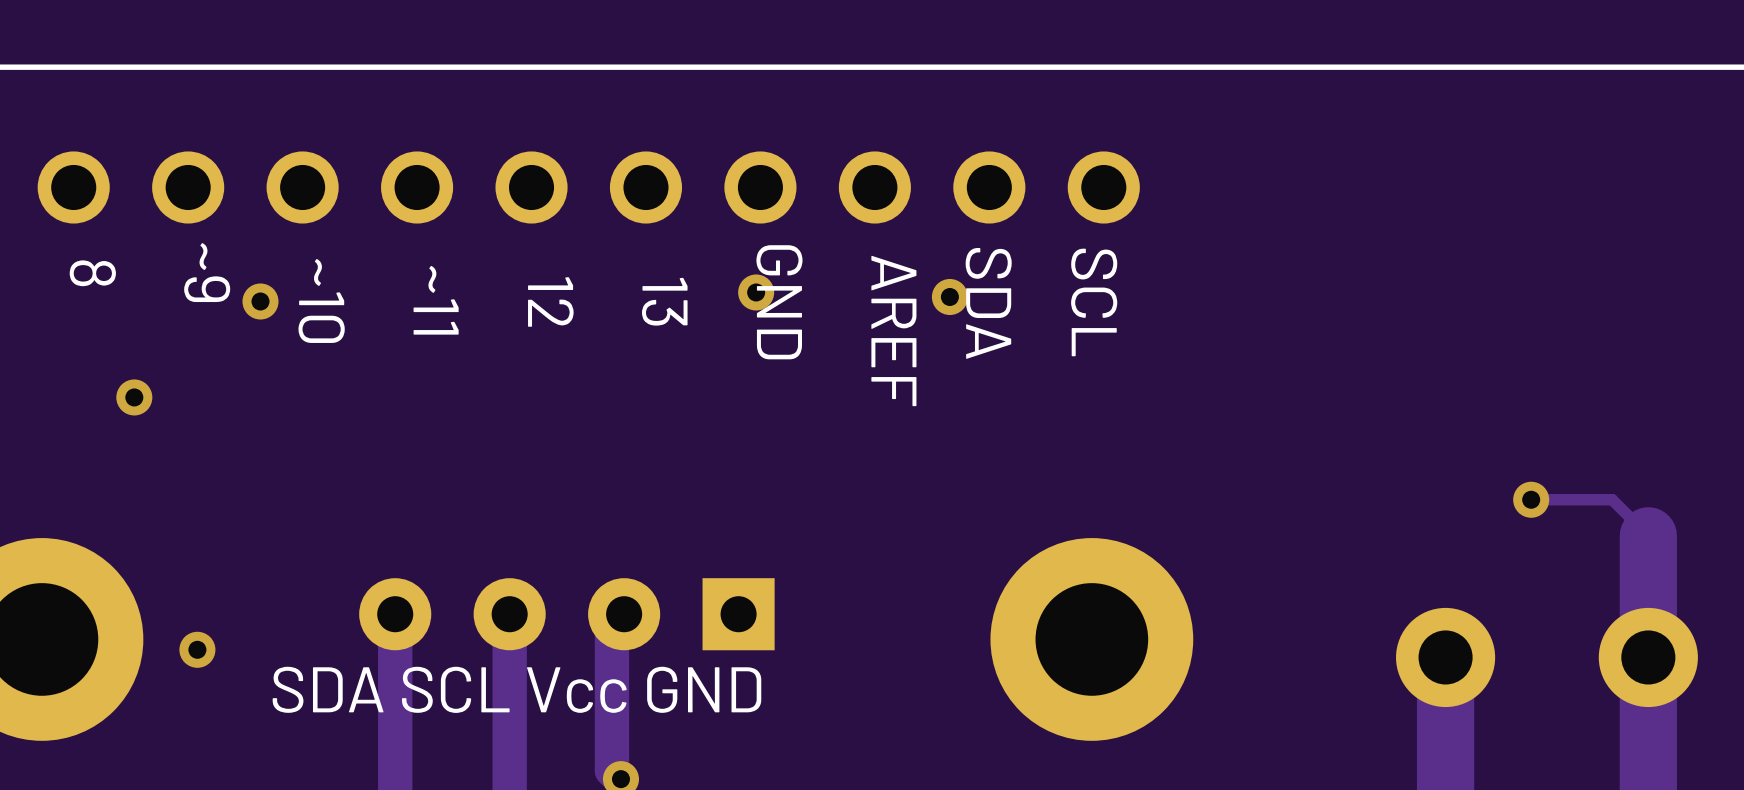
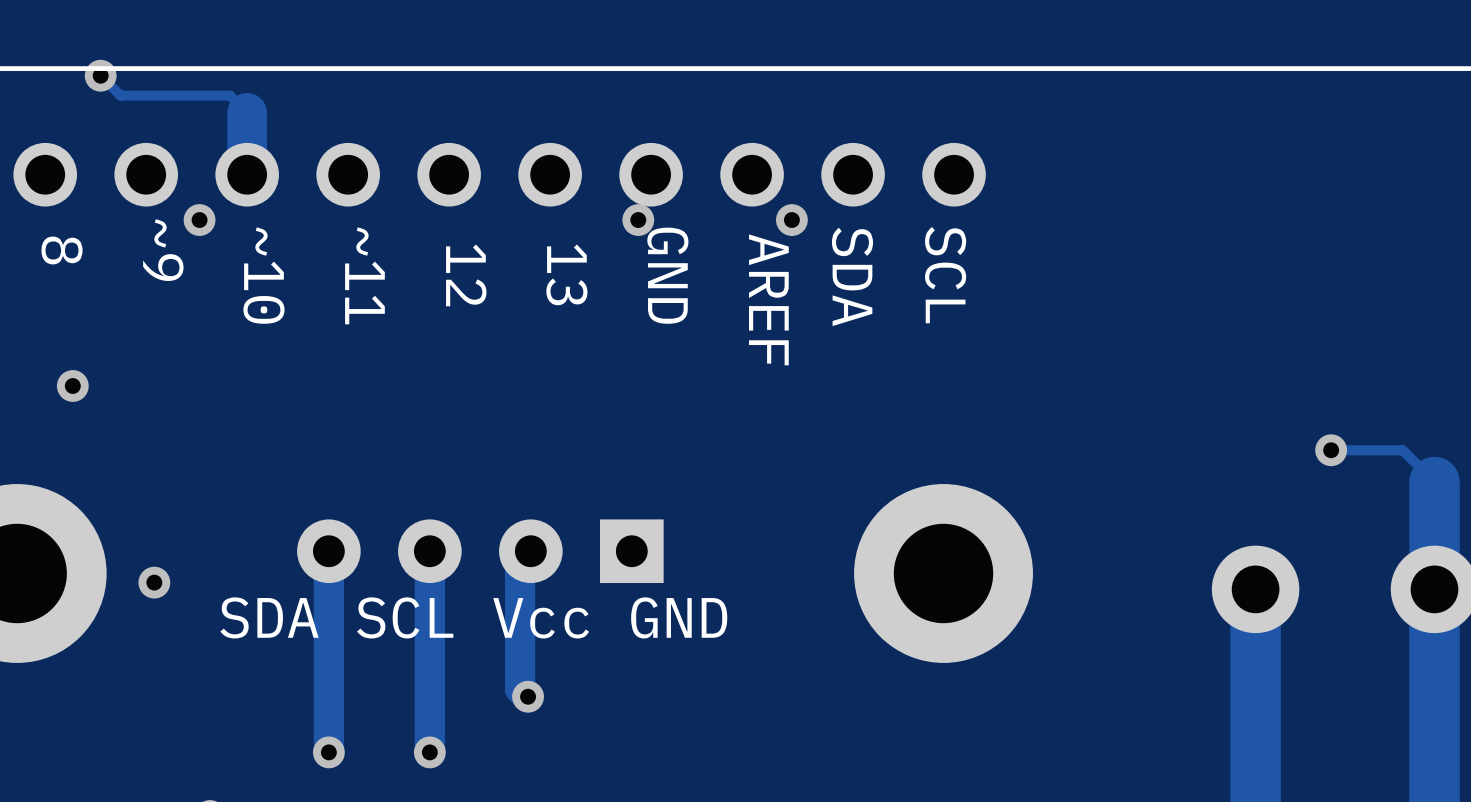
track: none -> (100, 75) (120, 95) (229, 95) (247, 112) (247, 174)
via: none -> (100, 75)
via position: (756, 292) -> (638, 220)
via position: (949, 296) -> (791, 220)
via position: (260, 301) -> (199, 220)
via position: (134, 397) -> (72, 386)

